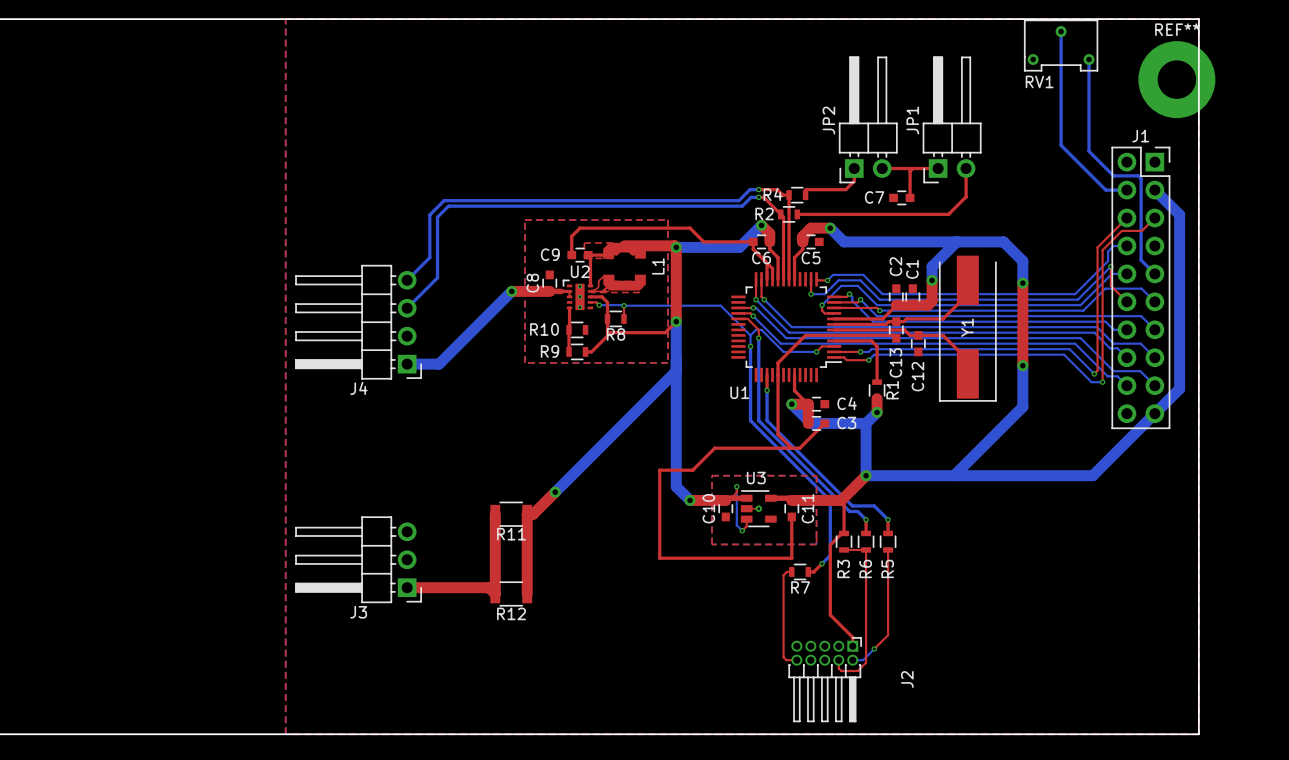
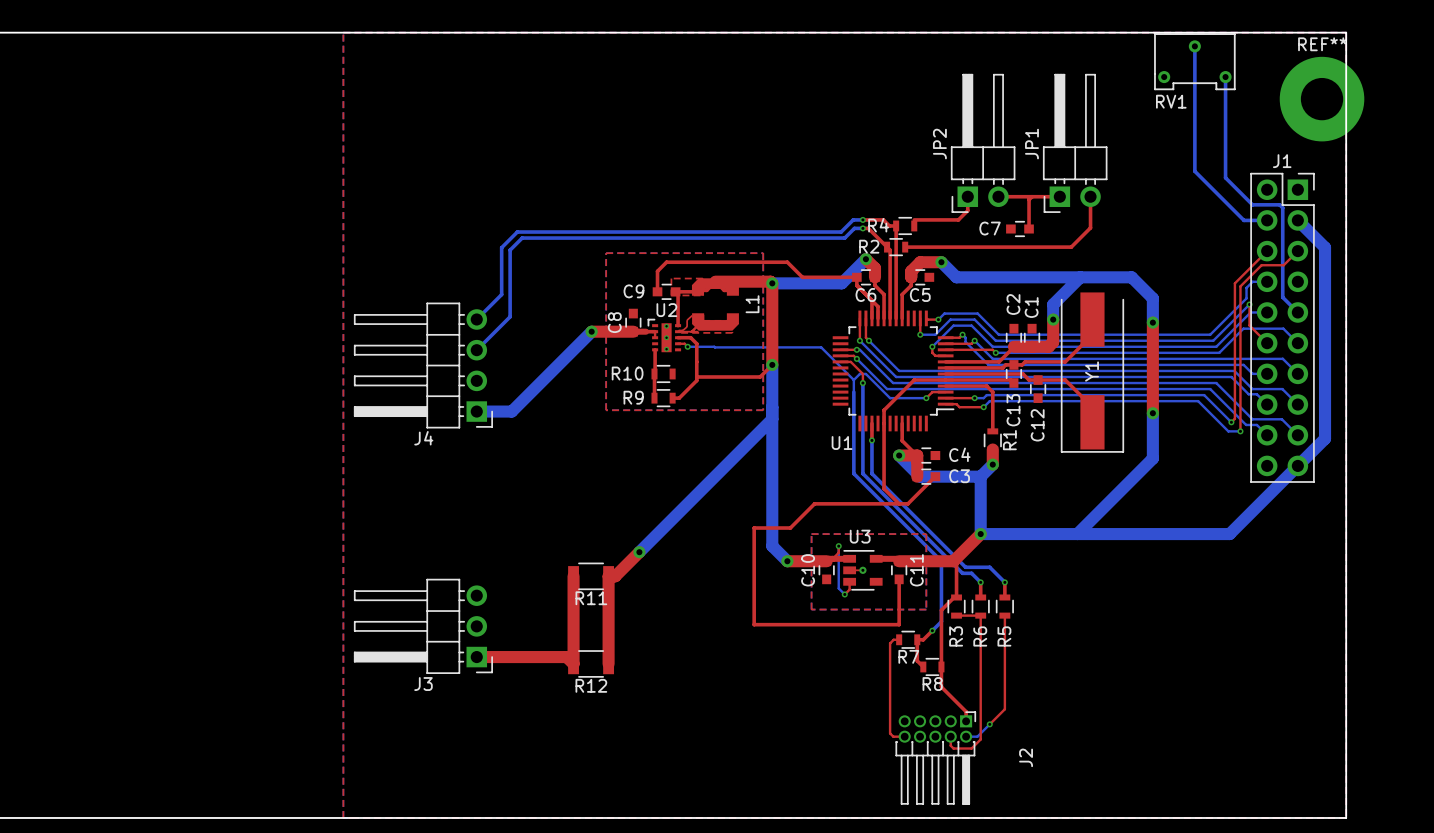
top track: (624, 305) (624, 318) -> none
via: (624, 305) -> none
R8 position: (615, 318) -> (932, 666)
via: (750, 346) -> none
top track: none -> (917, 639) (917, 660) (923, 666)

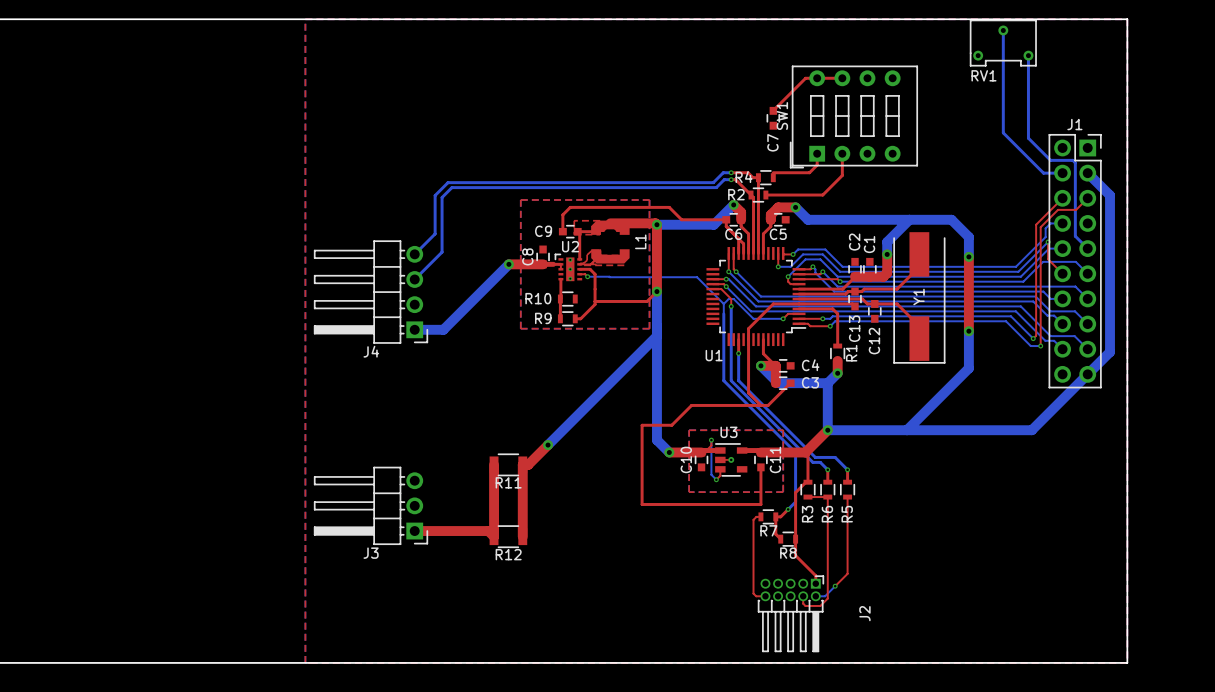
REF**: (1322, 99) -> none
top track: none -> (842, 78) (805, 78) (773, 110)
JP2: (983, 143) -> none
JP1: (1075, 143) -> none
SW1: none -> (853, 116)
top track: (998, 196) (1059, 196) -> none
top track: (1090, 196) (1090, 227) (1071, 247) (974, 247) -> (842, 153) (842, 175) (822, 195)
top track: (1029, 199) (1029, 228) -> none
C7 name position: C7 (990, 228) -> C7 (772, 142)
C7 rotation: 0° (1019, 228) -> 90° clockwise (773, 118)
C7 position: (1019, 228) -> (773, 118)

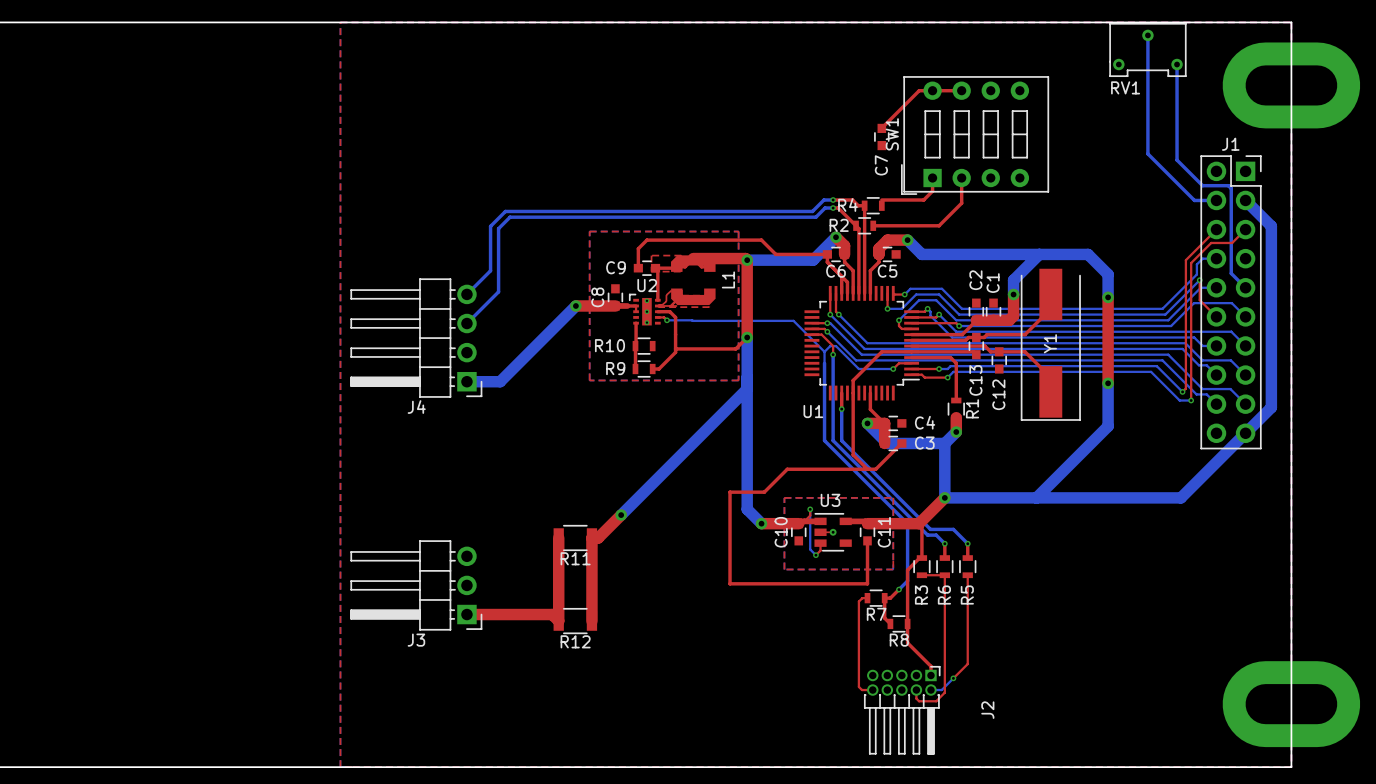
part: none -> (1291, 85)
part: none -> (1291, 704)

